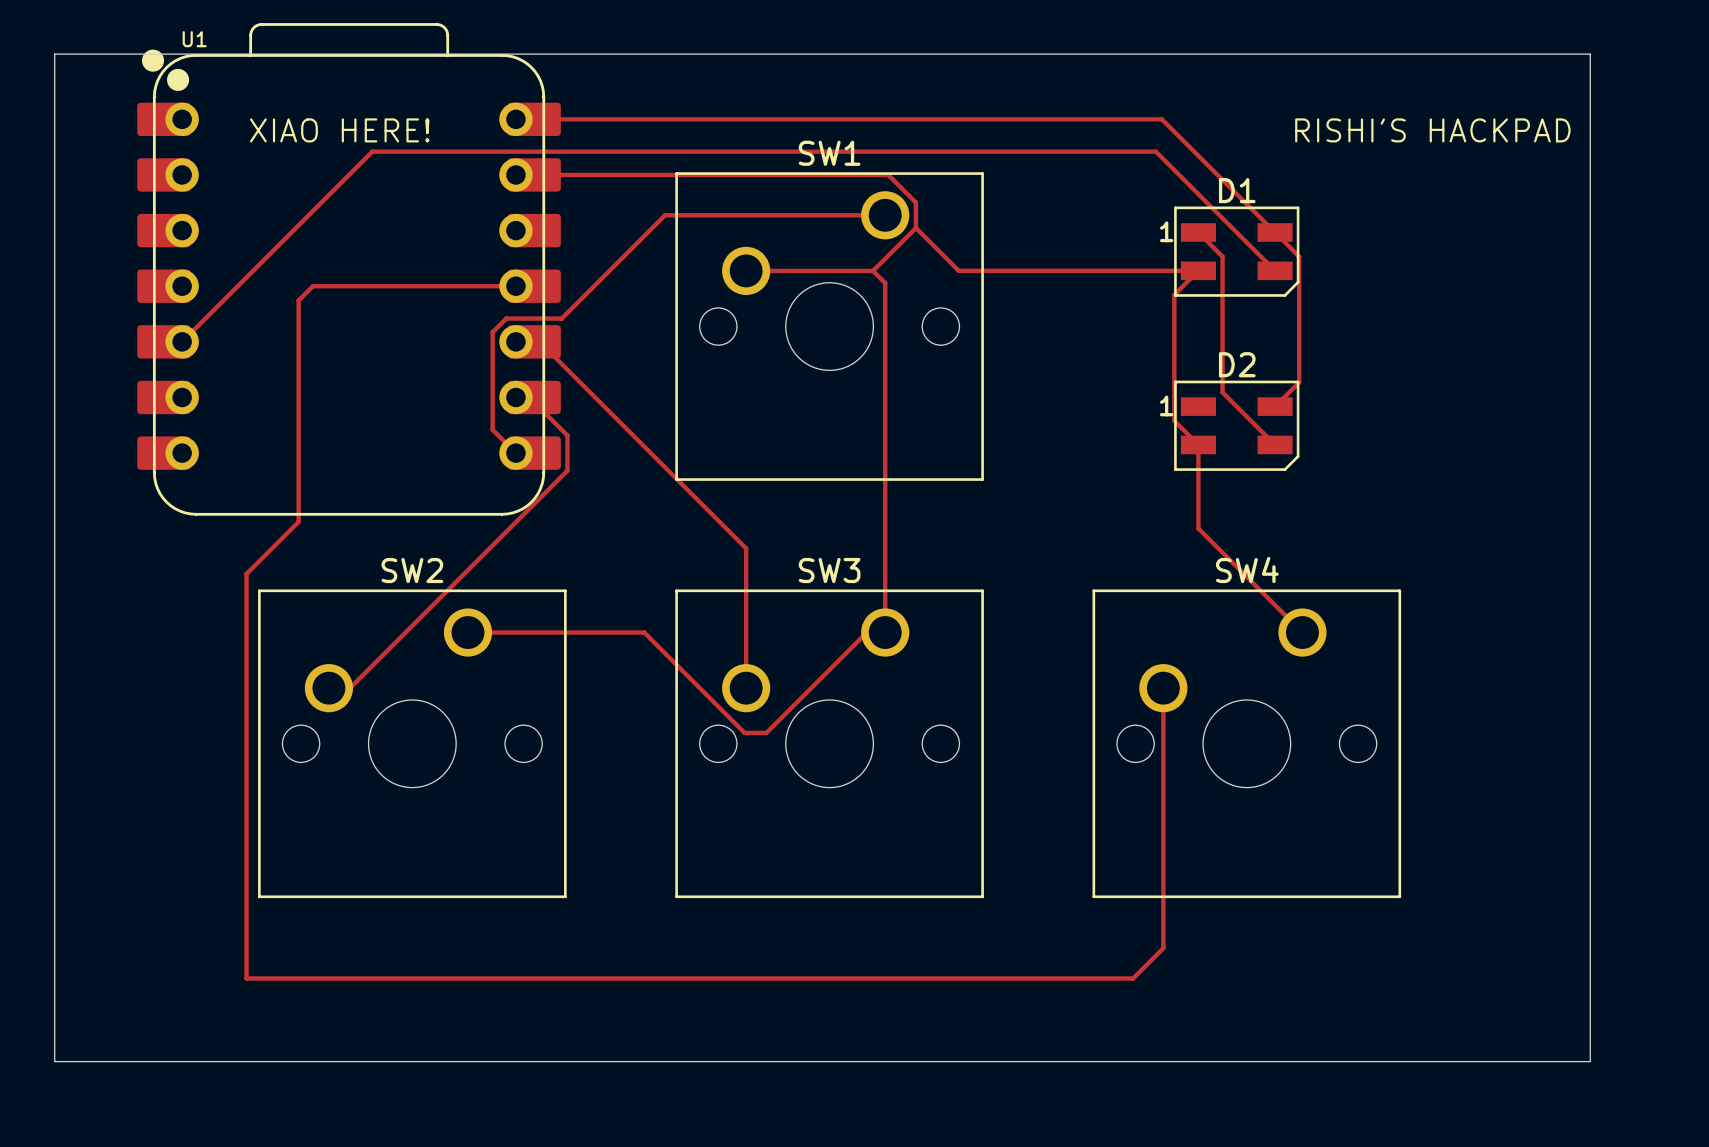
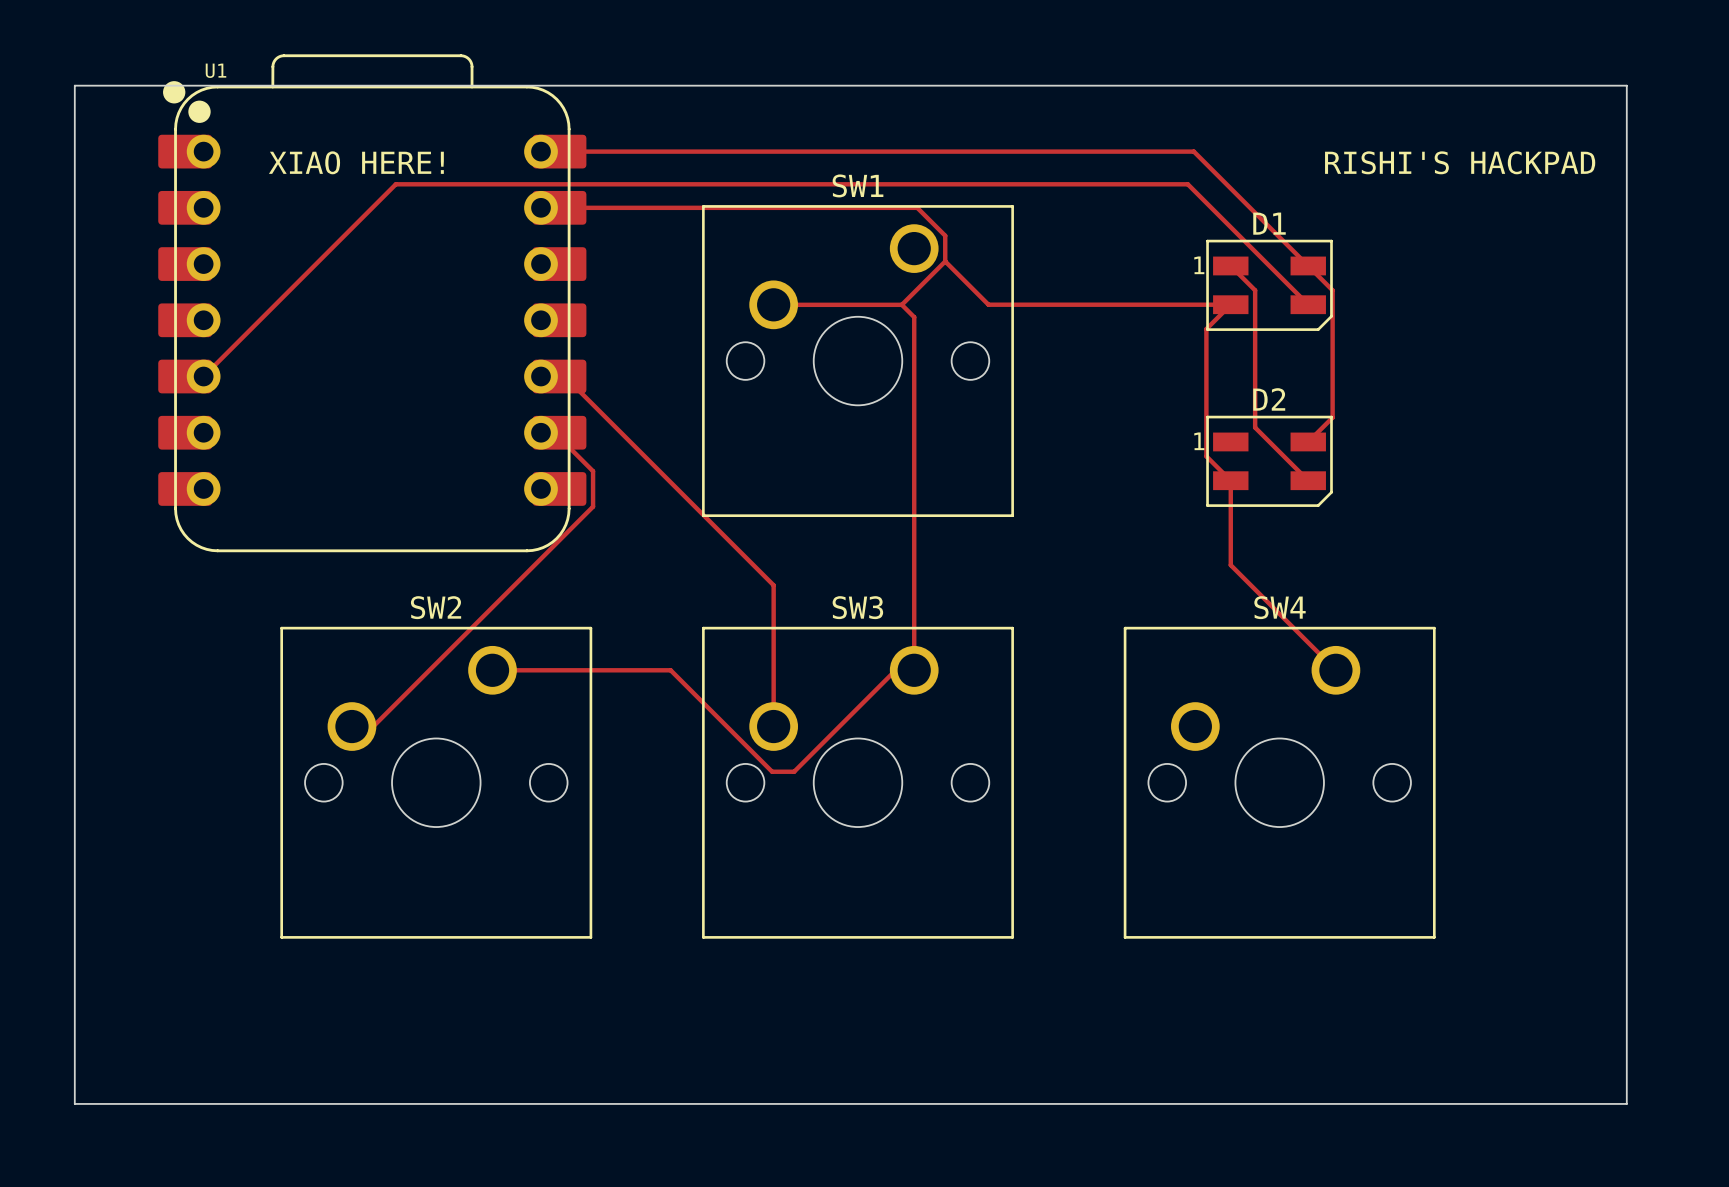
track: (885, 235) (885, 215) (665, 215) (561, 318) (506, 318) (492, 332) (492, 429) (515, 453) -> none
track: (515, 286) (312, 286) (298, 300) (298, 521) (246, 573) (246, 978) (1133, 978) (1163, 948) (1163, 688) -> none

